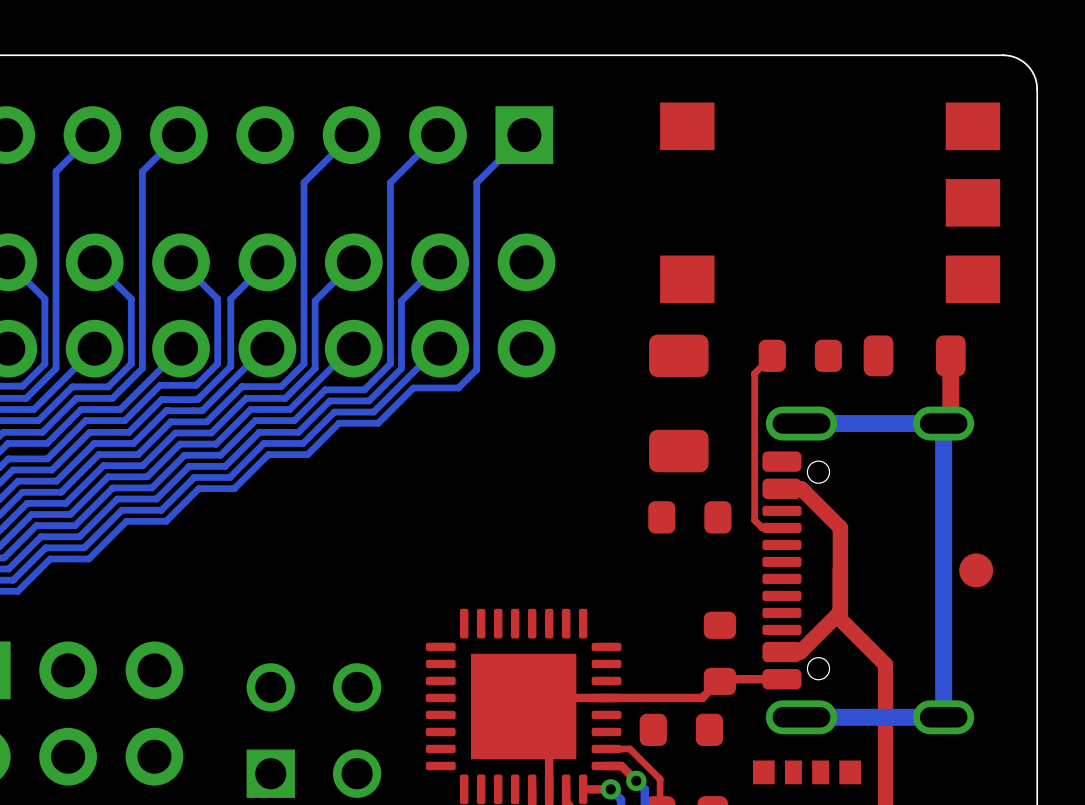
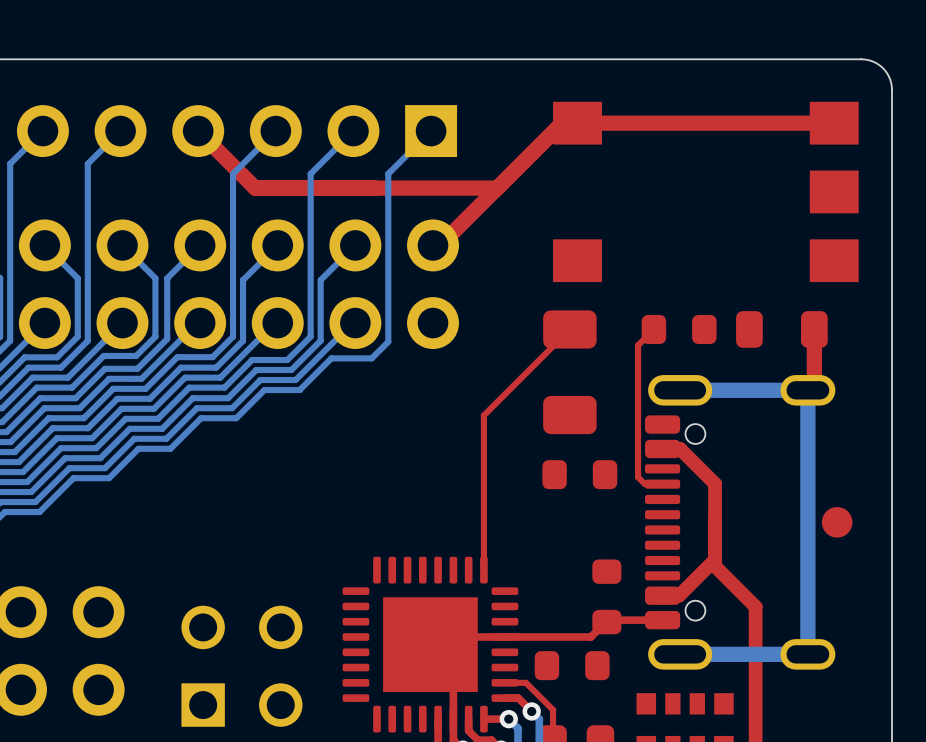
top track: none -> (834, 123) (562, 123) (440, 245) (433, 245)
top track: none -> (198, 131) (255, 188) (497, 188)
top track: none -> (569, 329) (483, 415) (483, 570)

